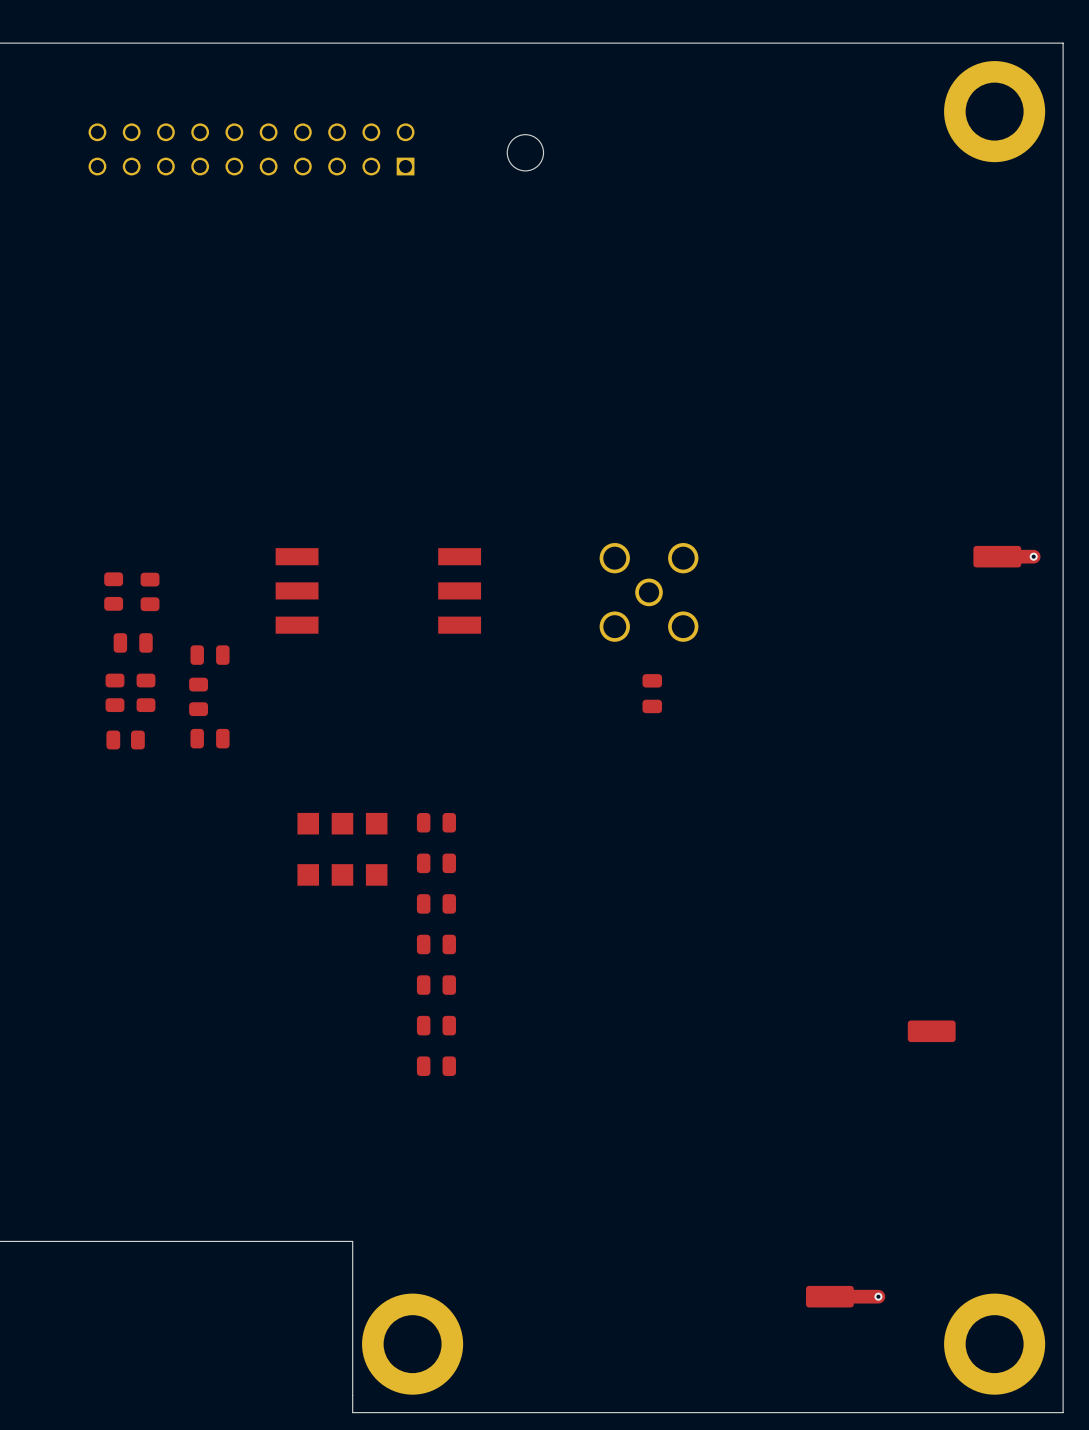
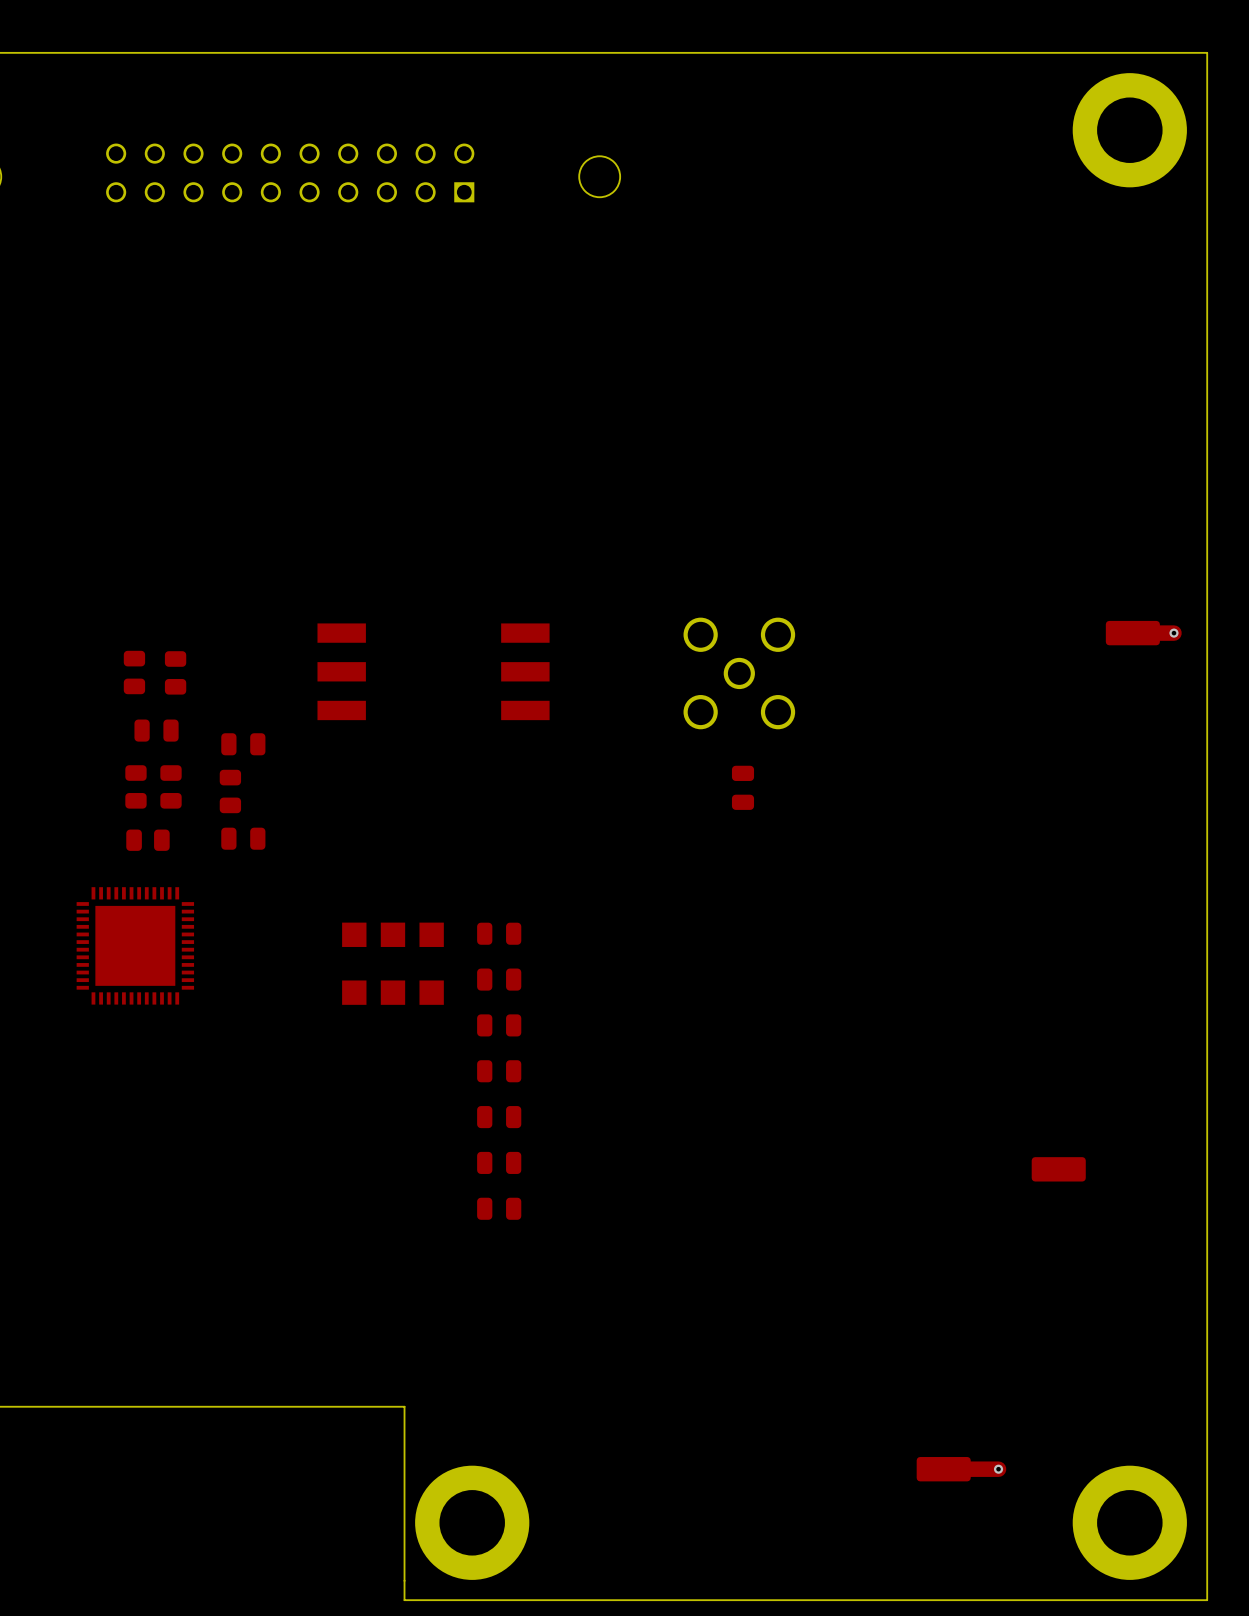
part: none -> (135, 945)

